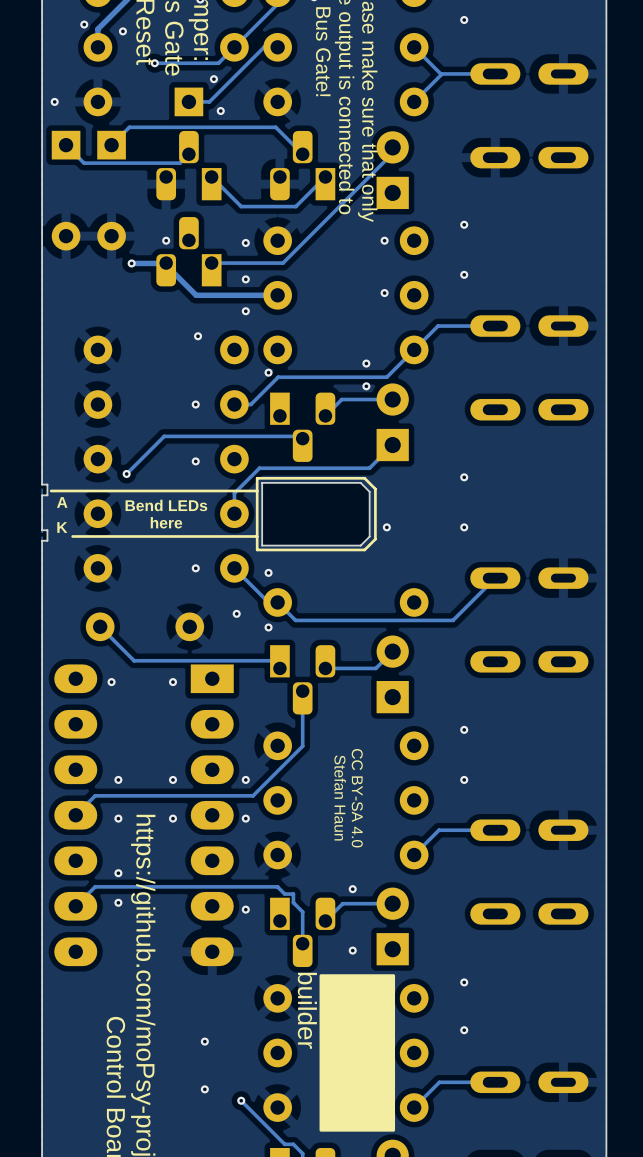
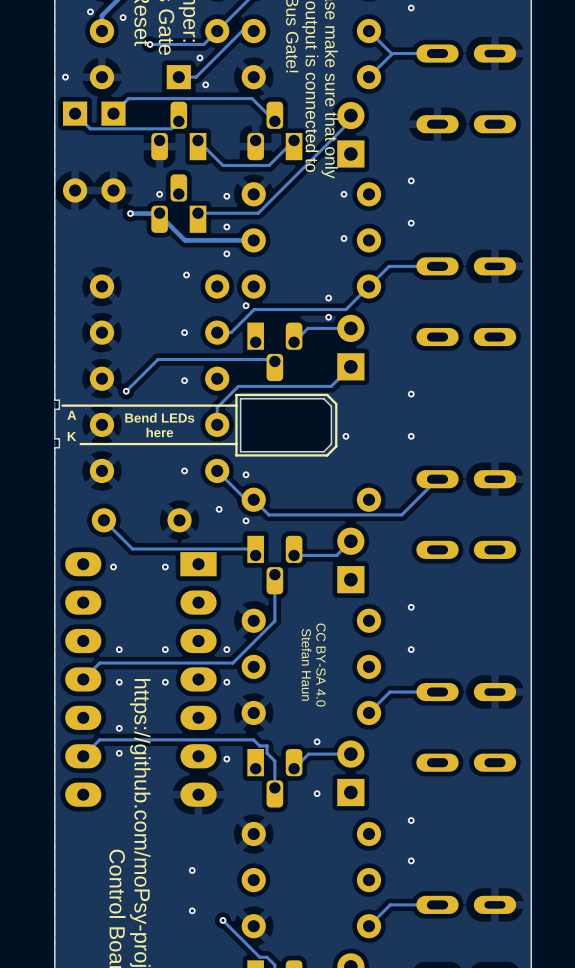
drawing: [319, 974, 396, 1132] -> none
text: builder (307, 1010) -> none

